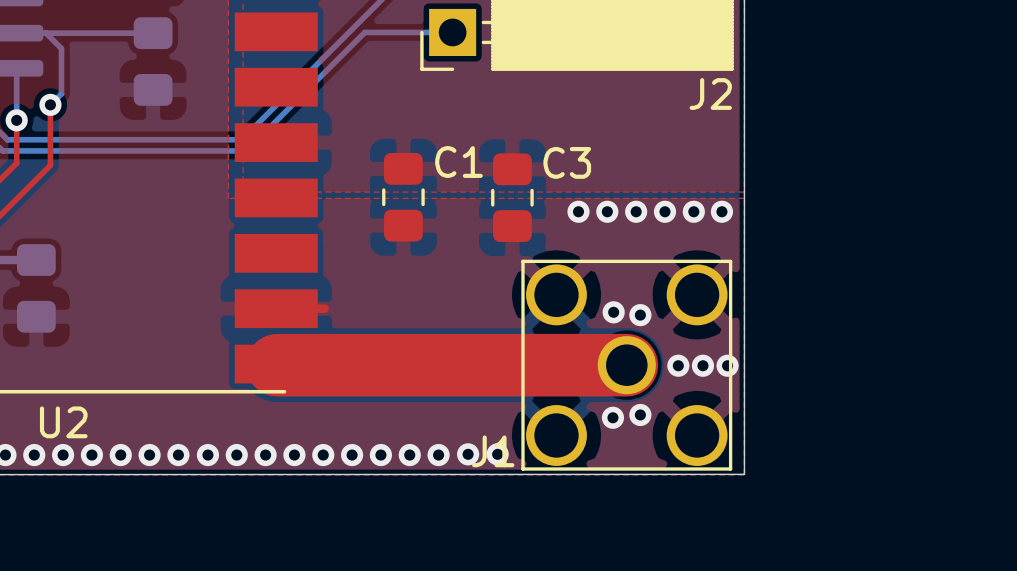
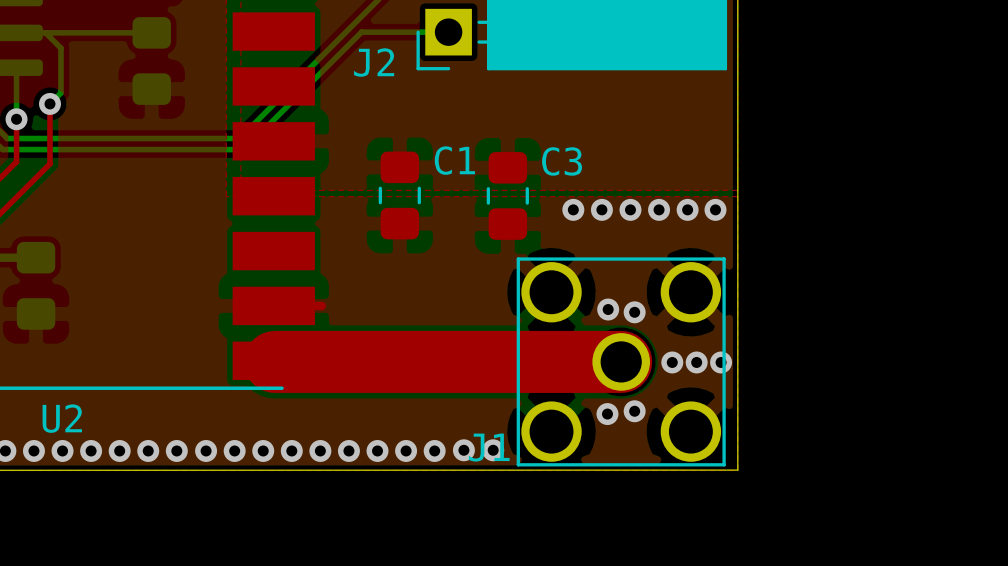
J2 name position: J2 (710, 94) -> J2 (374, 62)

